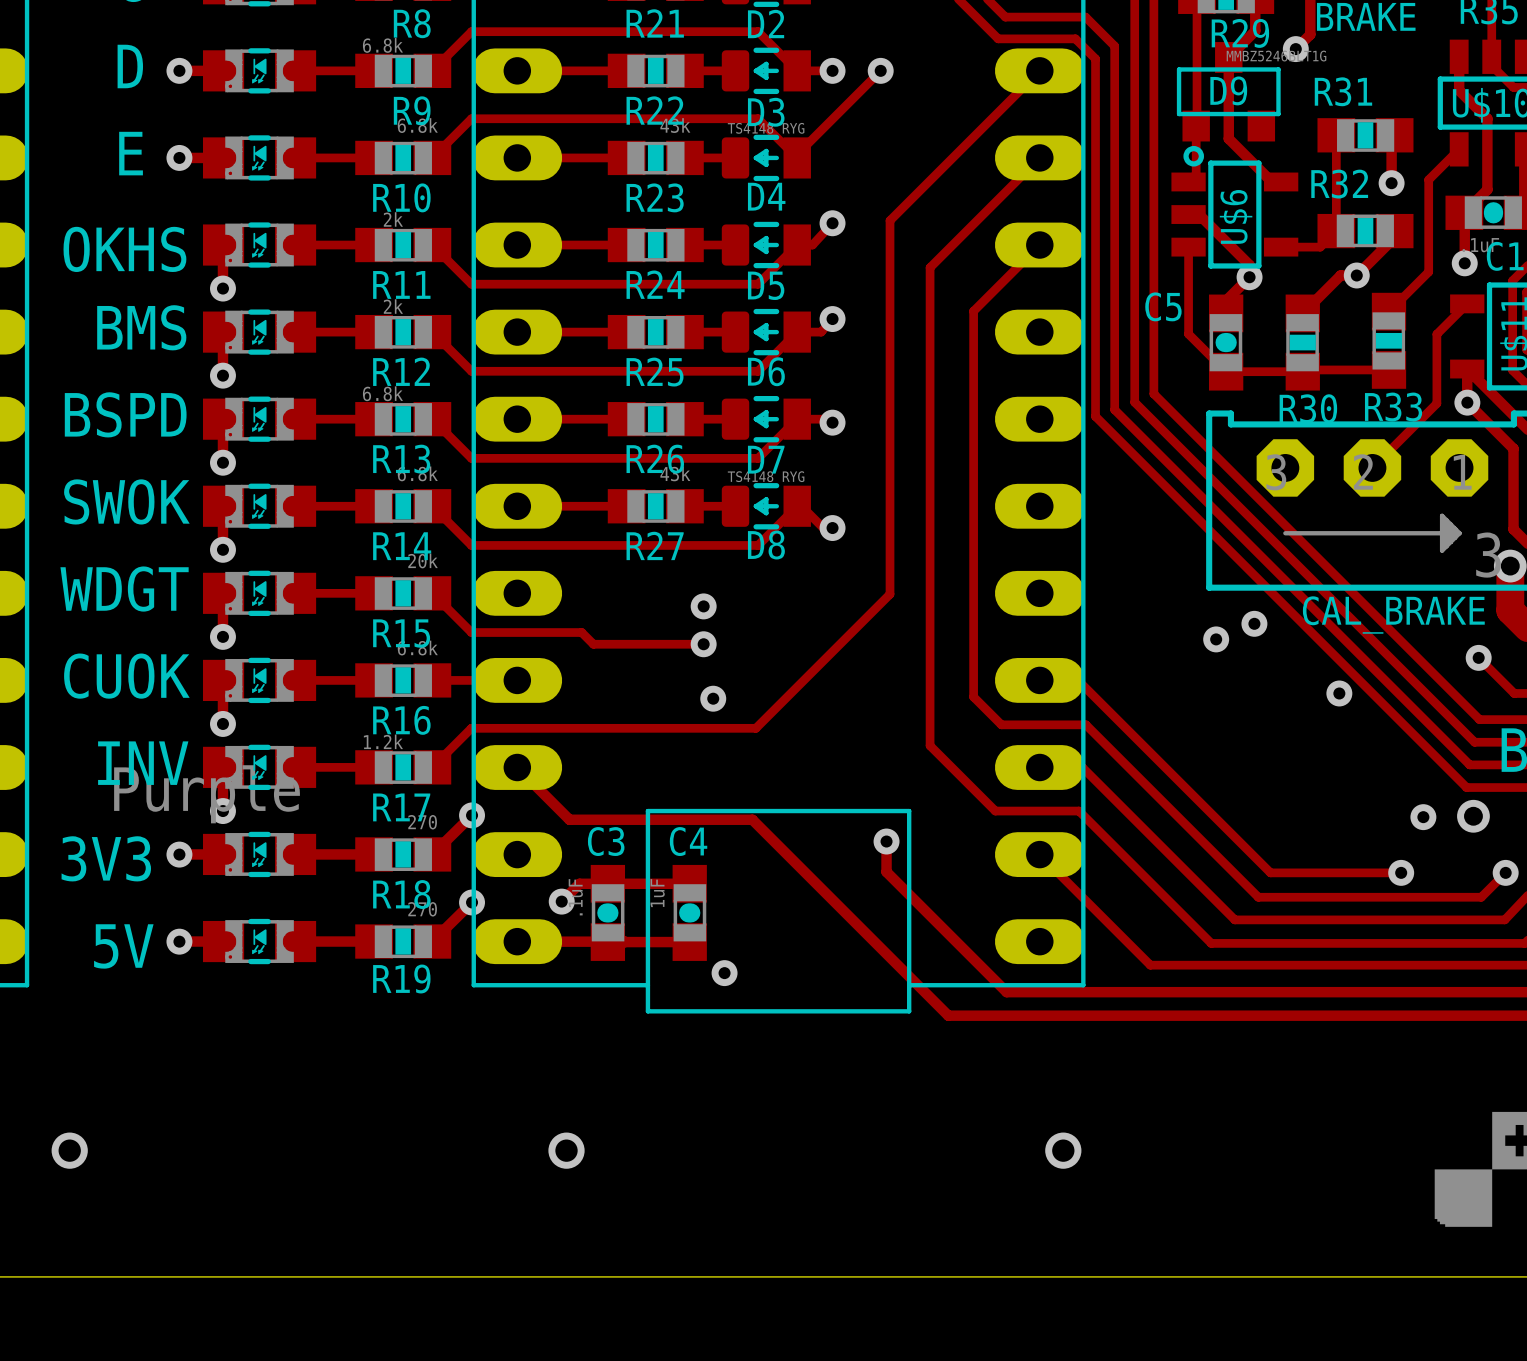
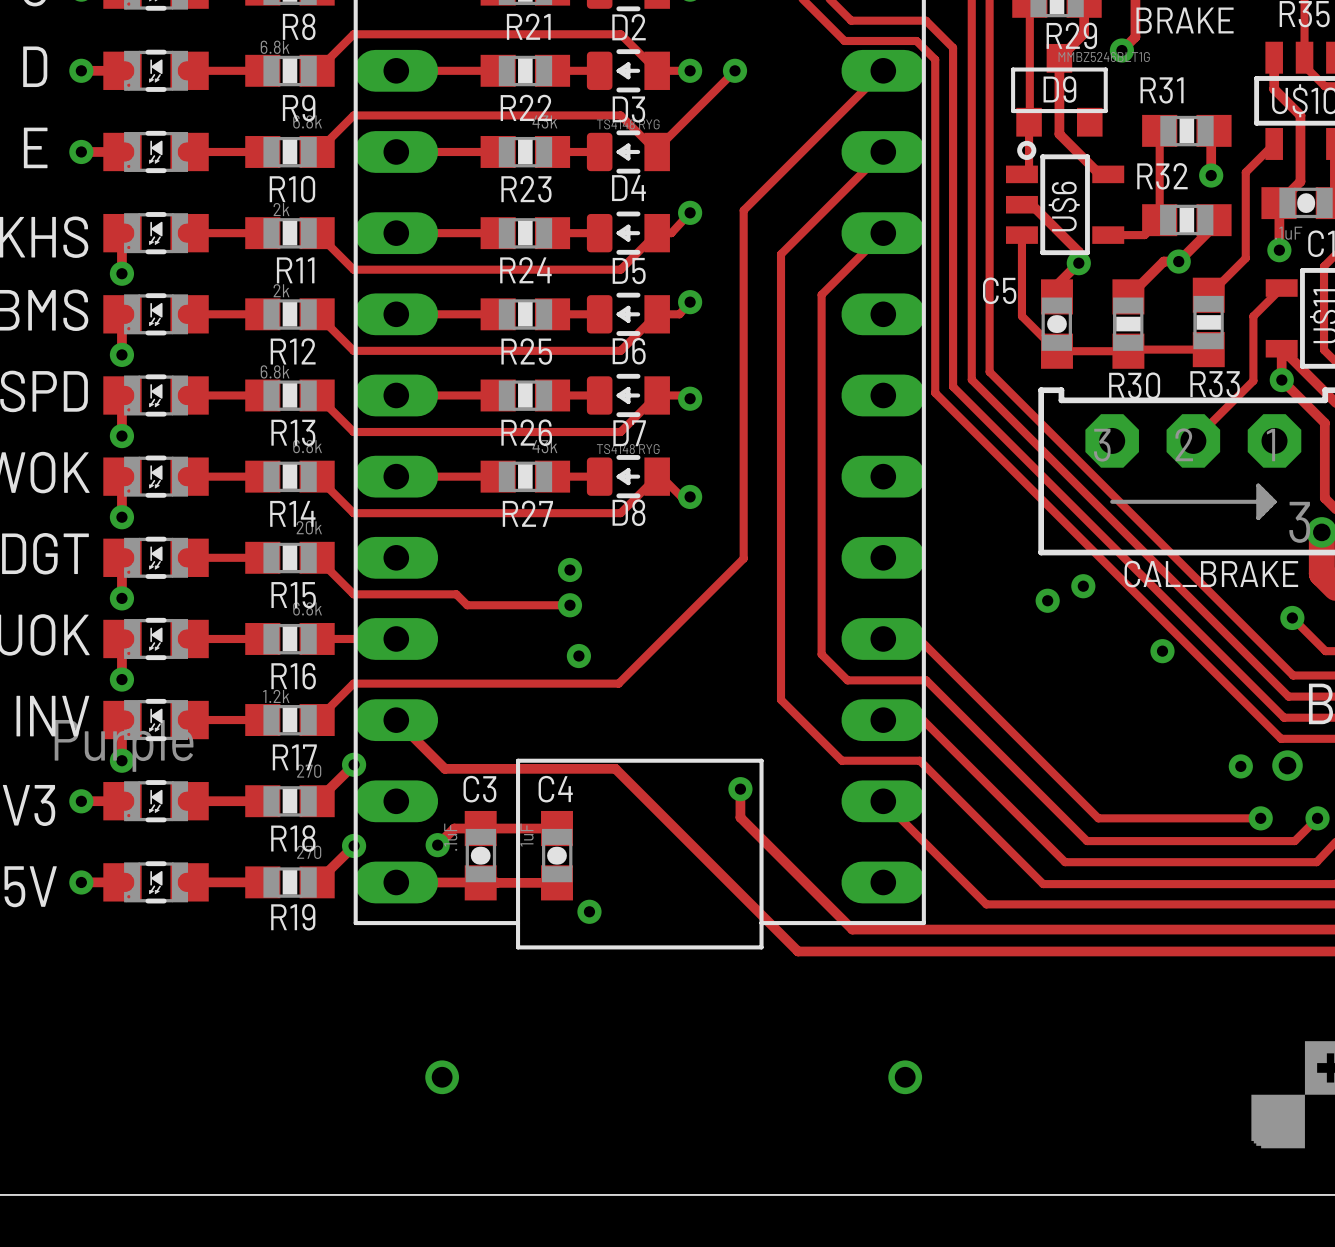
track: none -> (1220, 818) (1260, 818)
via position: (1401, 872) -> (1260, 818)

